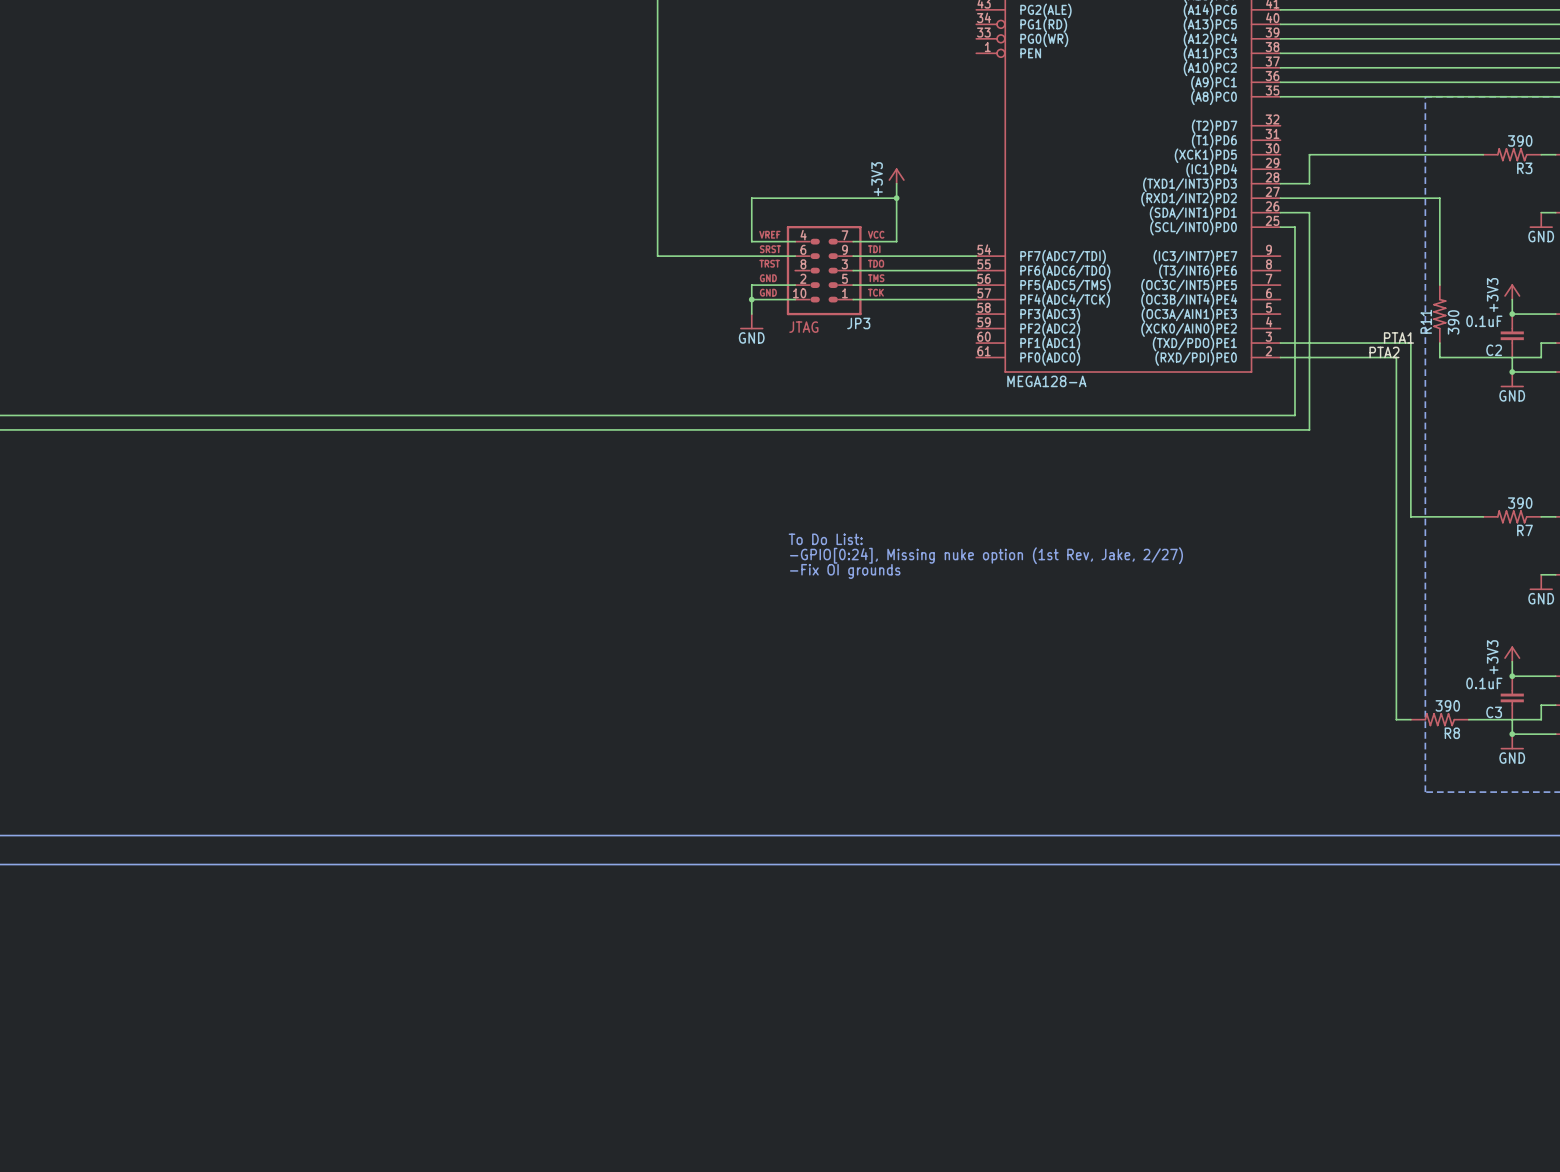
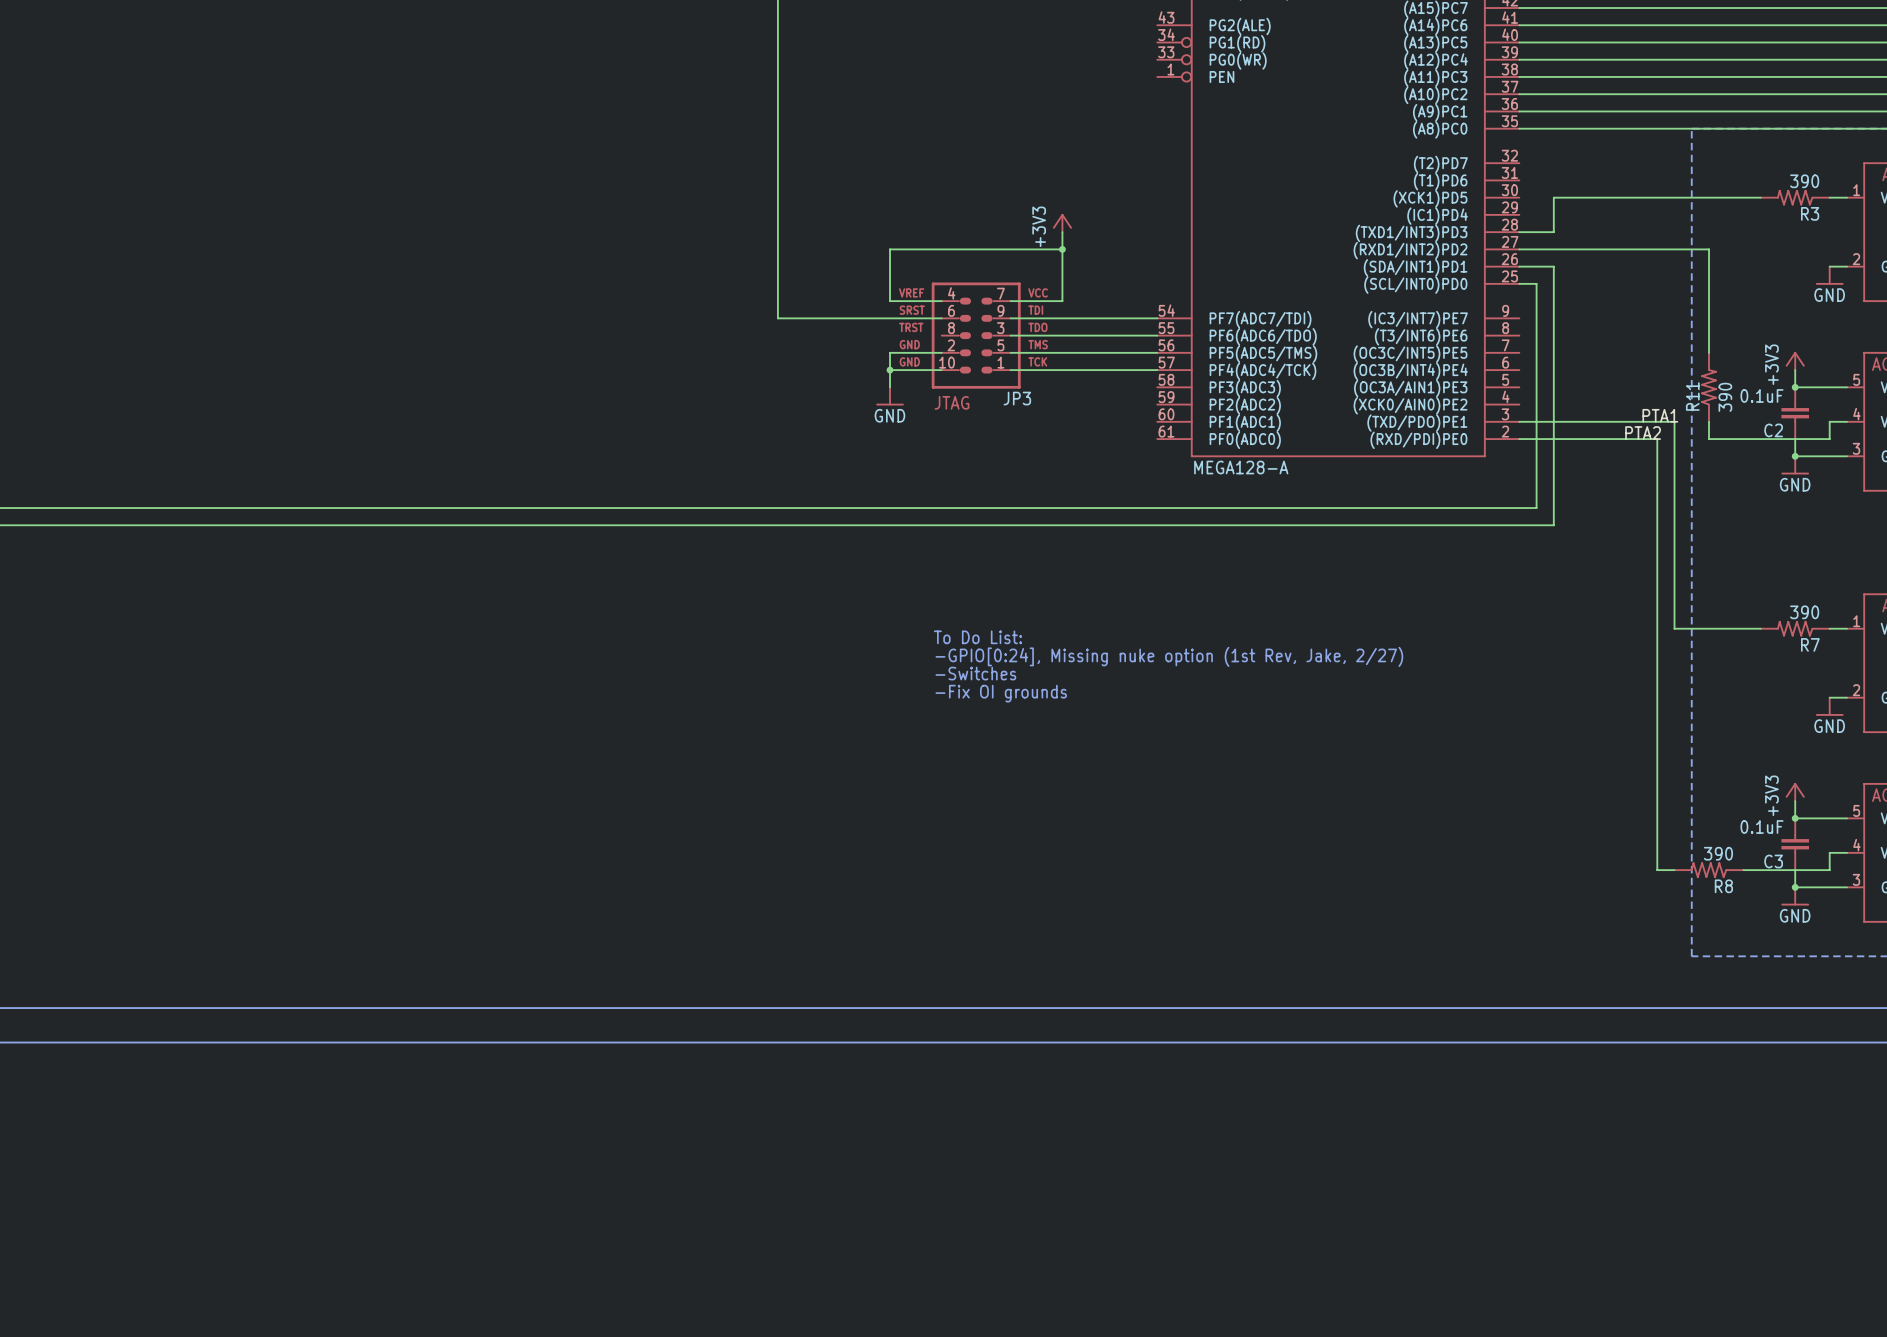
text: none -> To Do List: (977, 637)
text: To Do List: (825, 539) -> -GPIO[0:24], Missing nuke option (1st Rev, Jake, 2/27) (1169, 656)
text: -GPIO[0:24], Missing nuke option (1st Rev, Jake, 2/27) (986, 555) -> -Switches (975, 673)

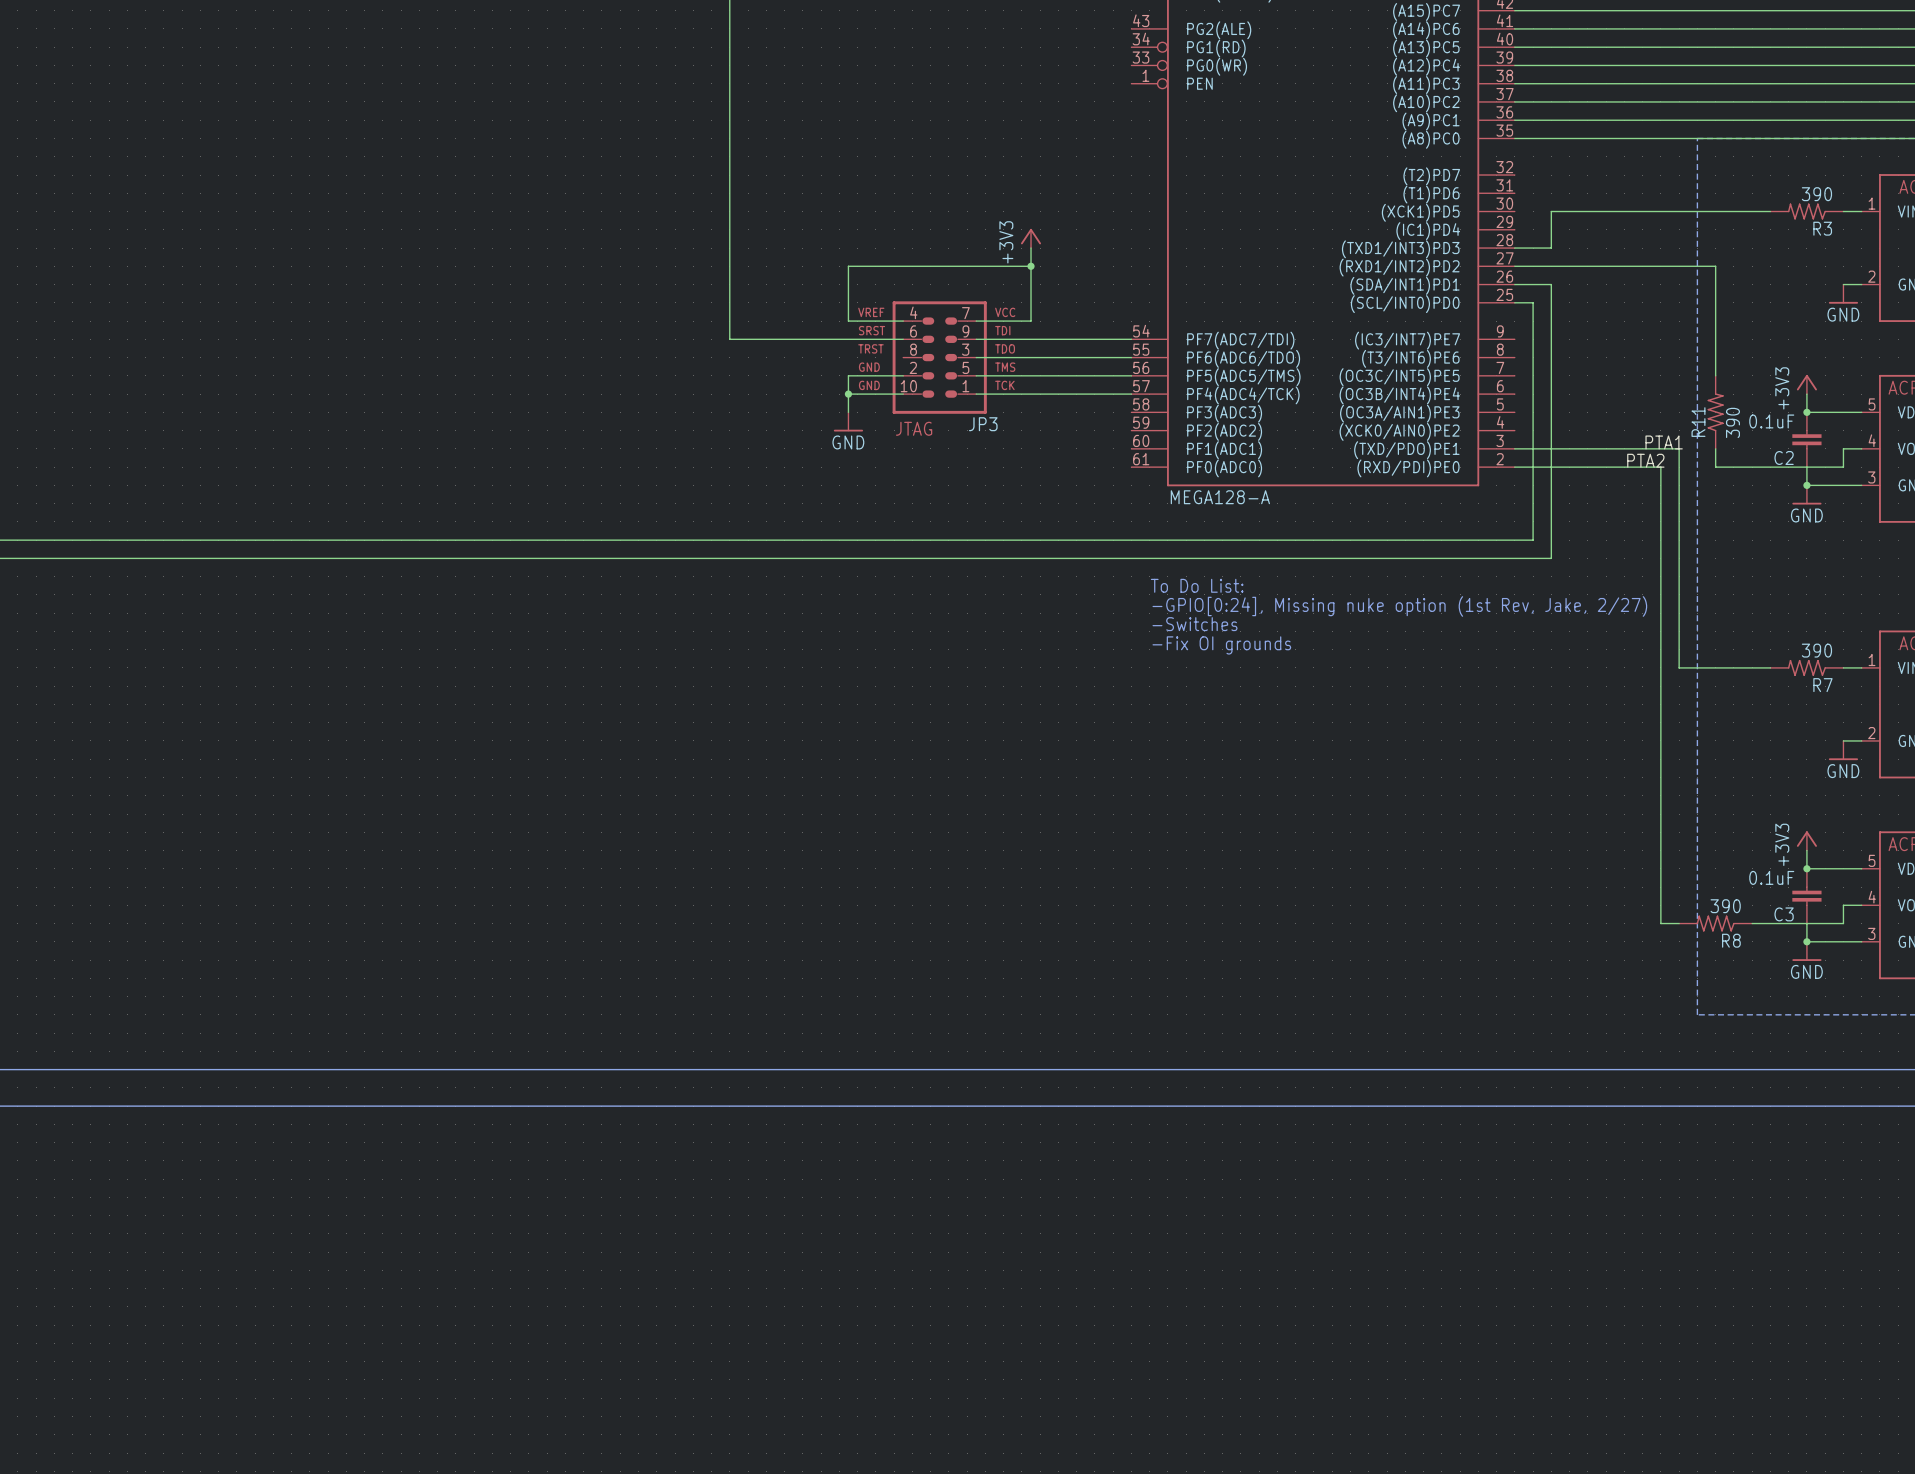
text: none -> To Do List: (1197, 585)
text: none -> -GPIO[0:24], Missing nuke option (1st Rev, Jake, 2/27) (1399, 606)
text: none -> -Switches (1194, 624)
text: none -> -Fix OI grounds (1221, 645)
text: To Do List: (977, 637) -> none
text: -GPIO[0:24], Missing nuke option (1st Rev, Jake, 2/27) (1169, 656) -> none
text: -Switches (975, 673) -> none
text: -Fix OI grounds (1001, 693) -> none

